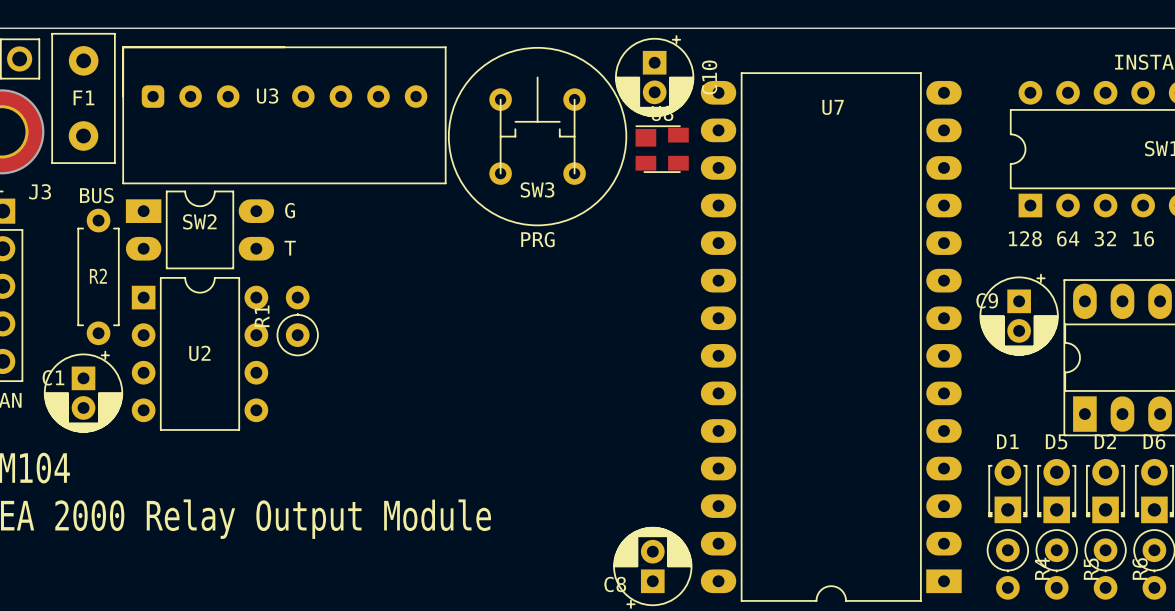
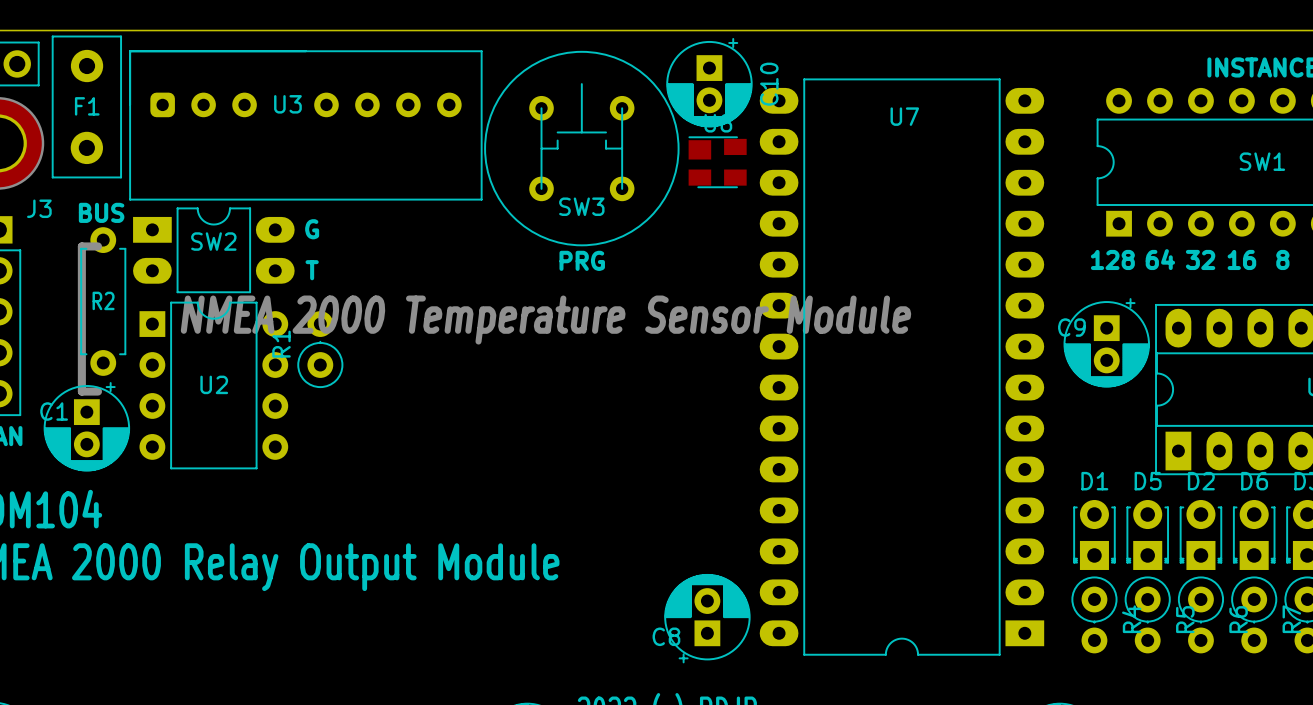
line: none -> (97, 246) (81, 246) (81, 391) (97, 391)
text: none -> NMEA 2000 Temperature Sensor Module (546, 320)

